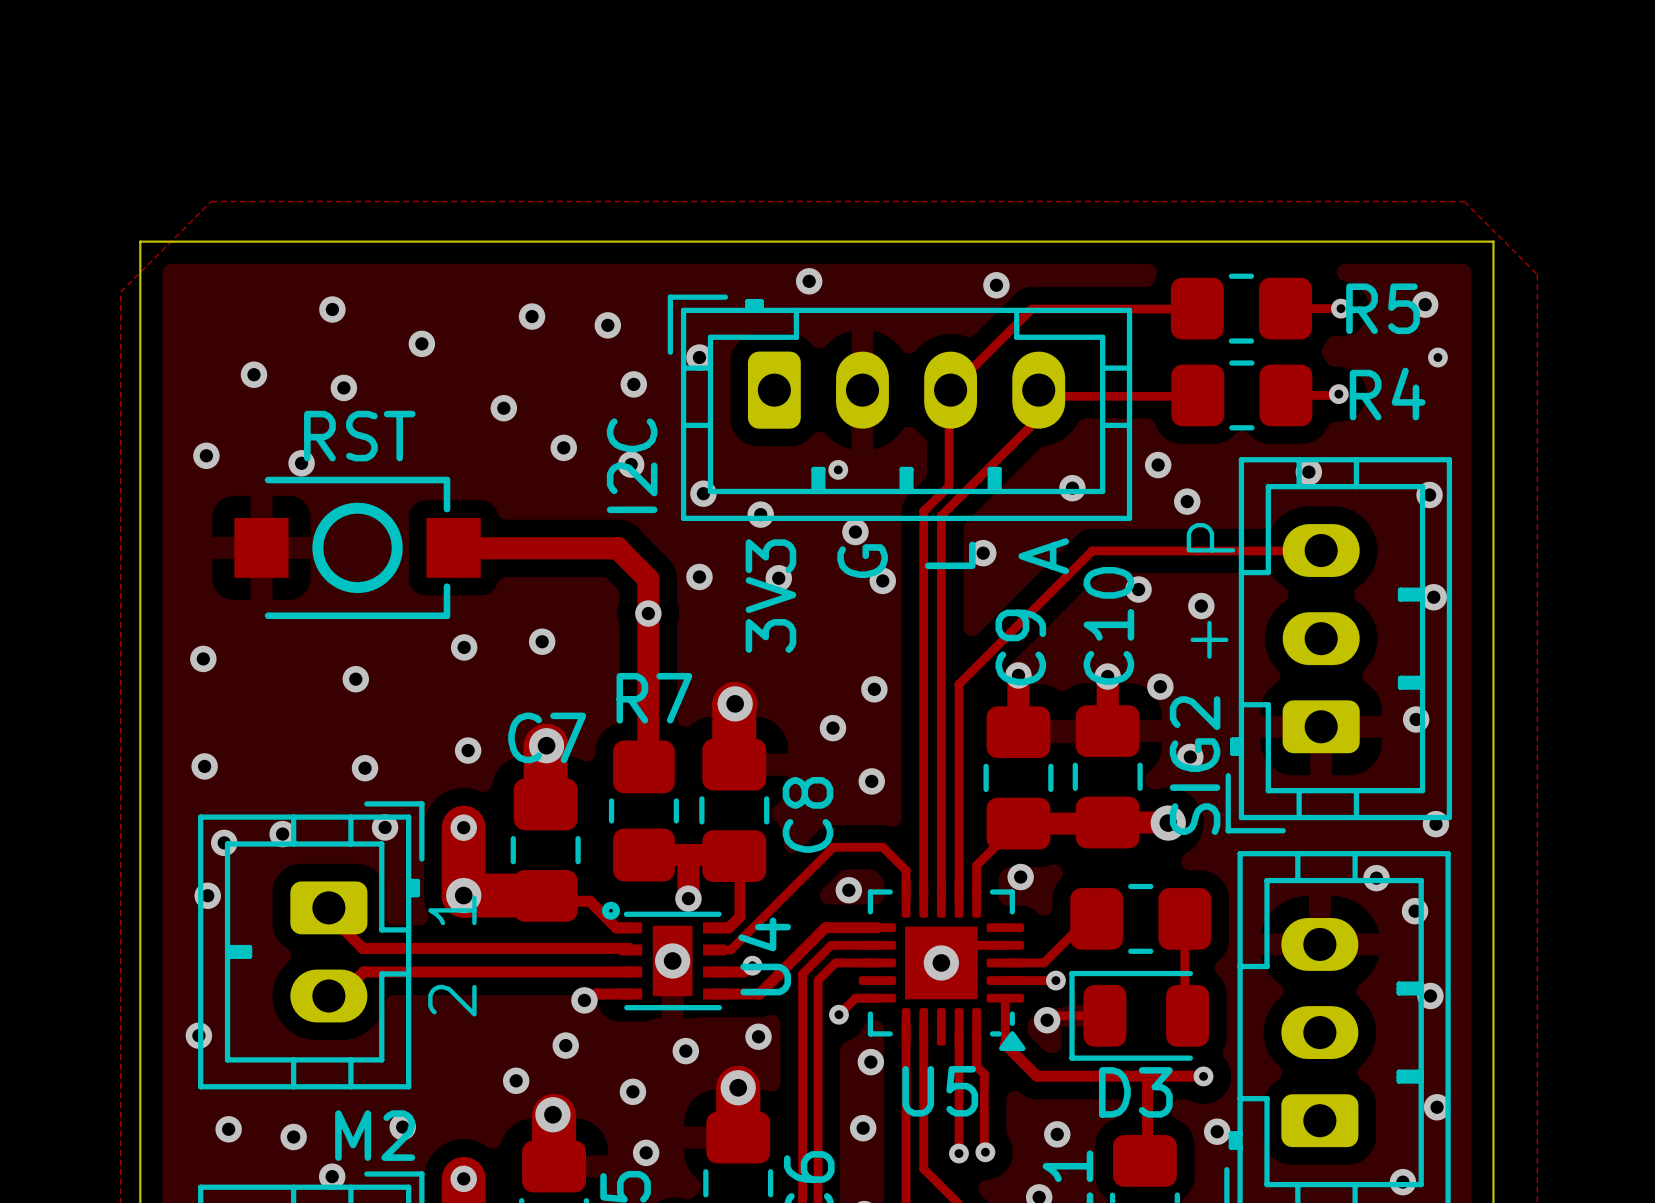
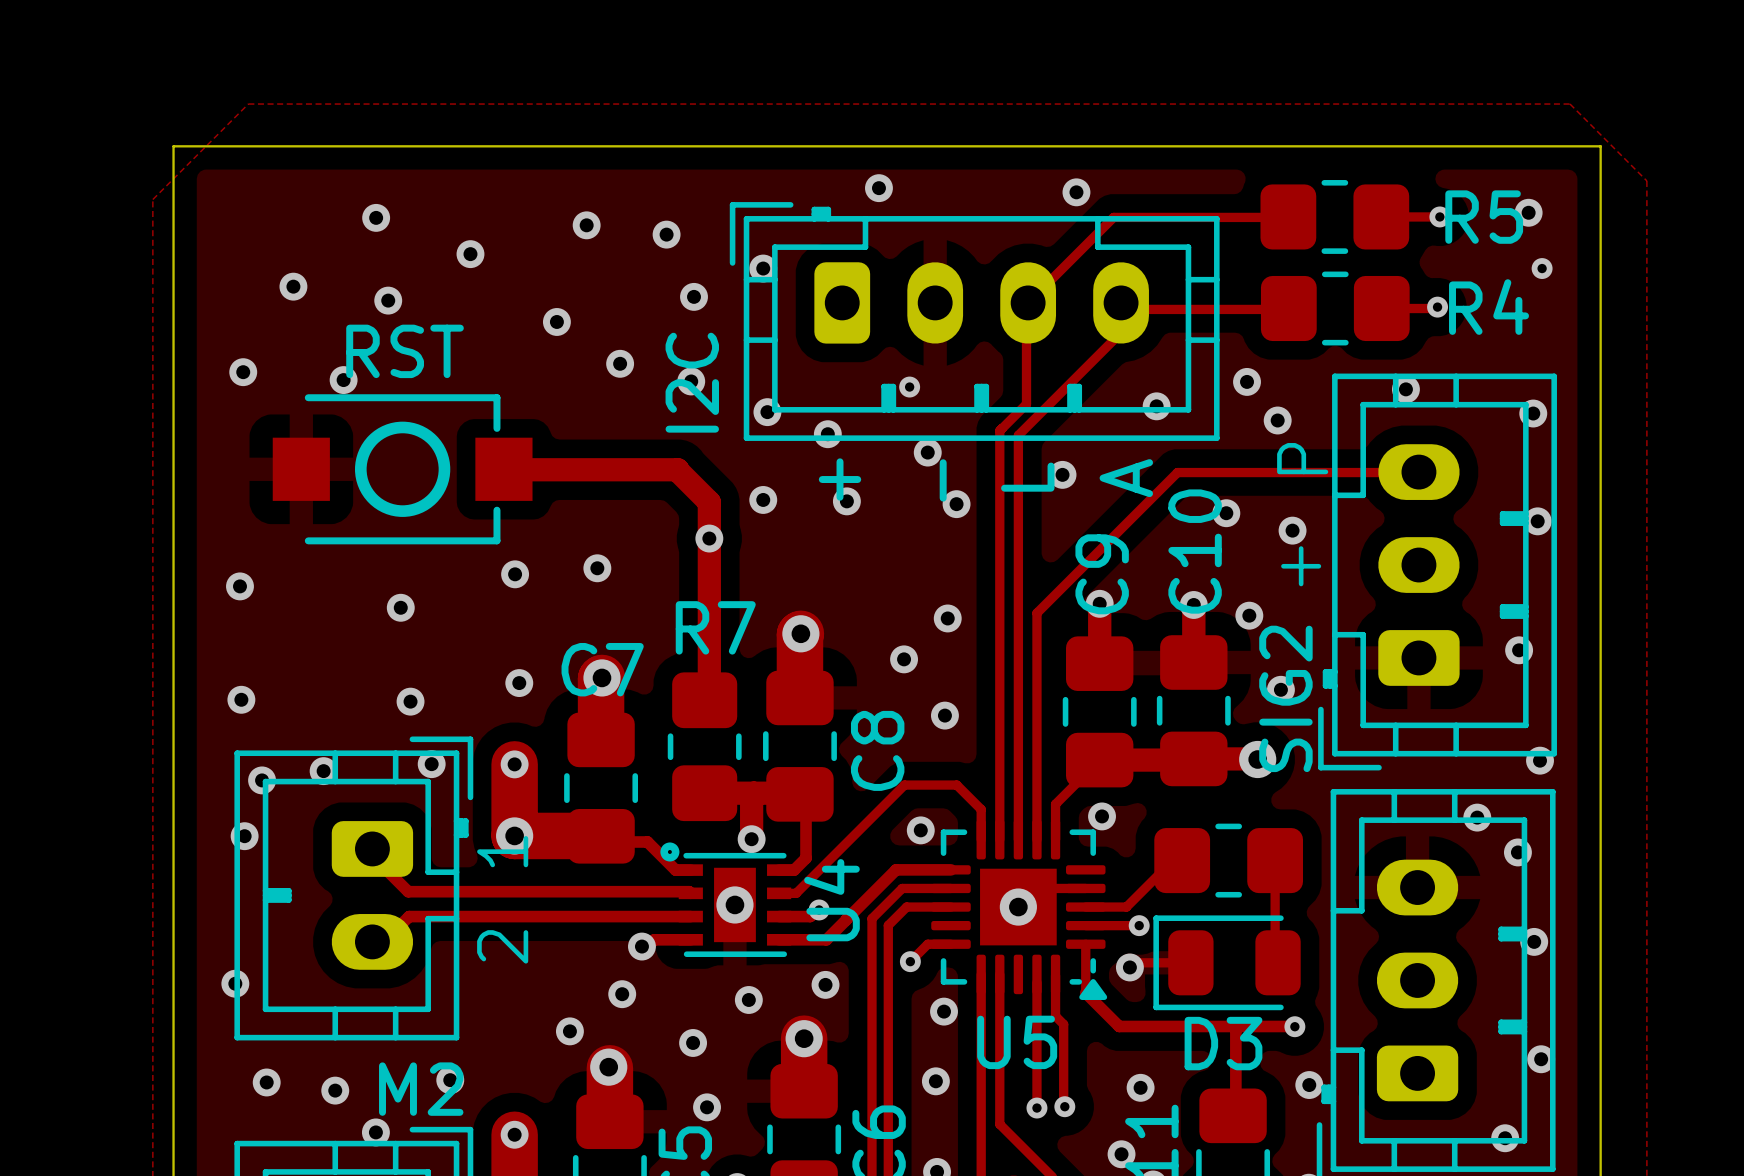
text: G (862, 561) -> - (943, 480)
text: 3V3 (770, 596) -> + (840, 479)

